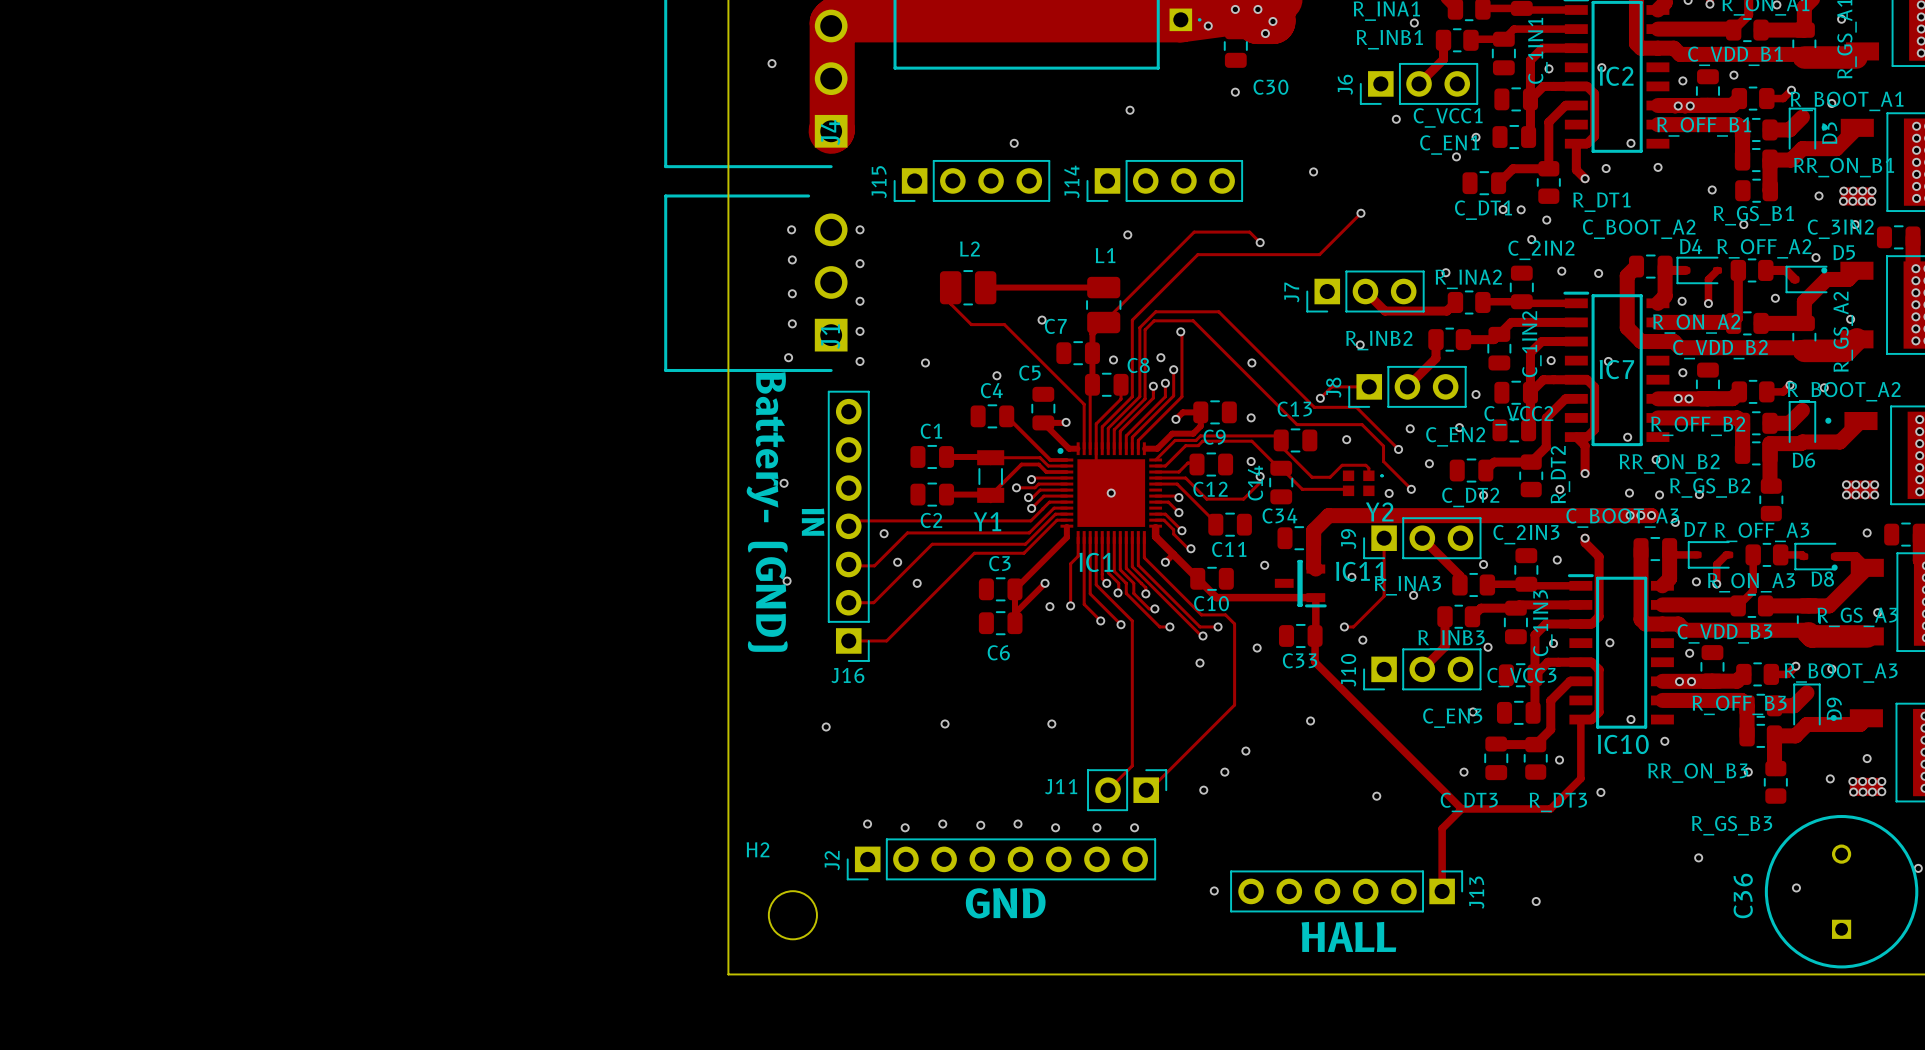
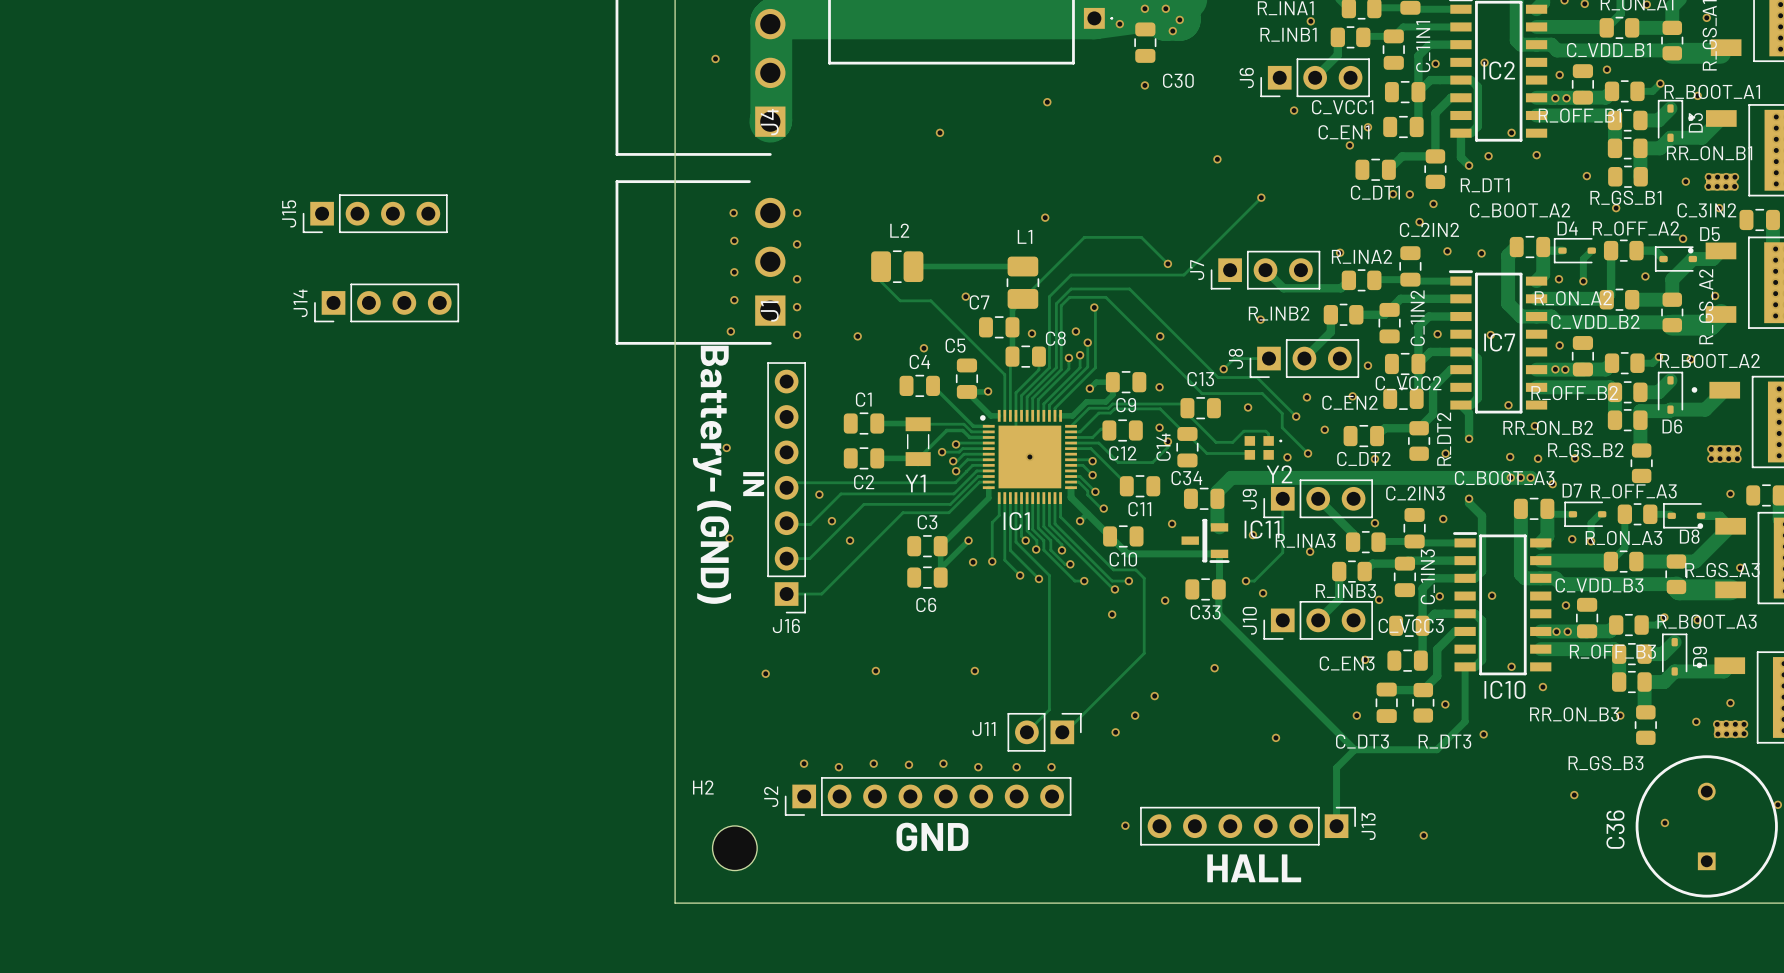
J15 position: (971, 180) -> (375, 213)
J14 position: (1164, 180) -> (386, 302)
track: (1260, 242) (1249, 232) (1194, 232) (1170, 256) -> (1167, 263) (1141, 237) (1084, 237)
via position: (1260, 242) -> (1167, 263)
track: (1319, 254) (1197, 254) (1155, 296) -> (1222, 236) (1183, 275) (1071, 275)

